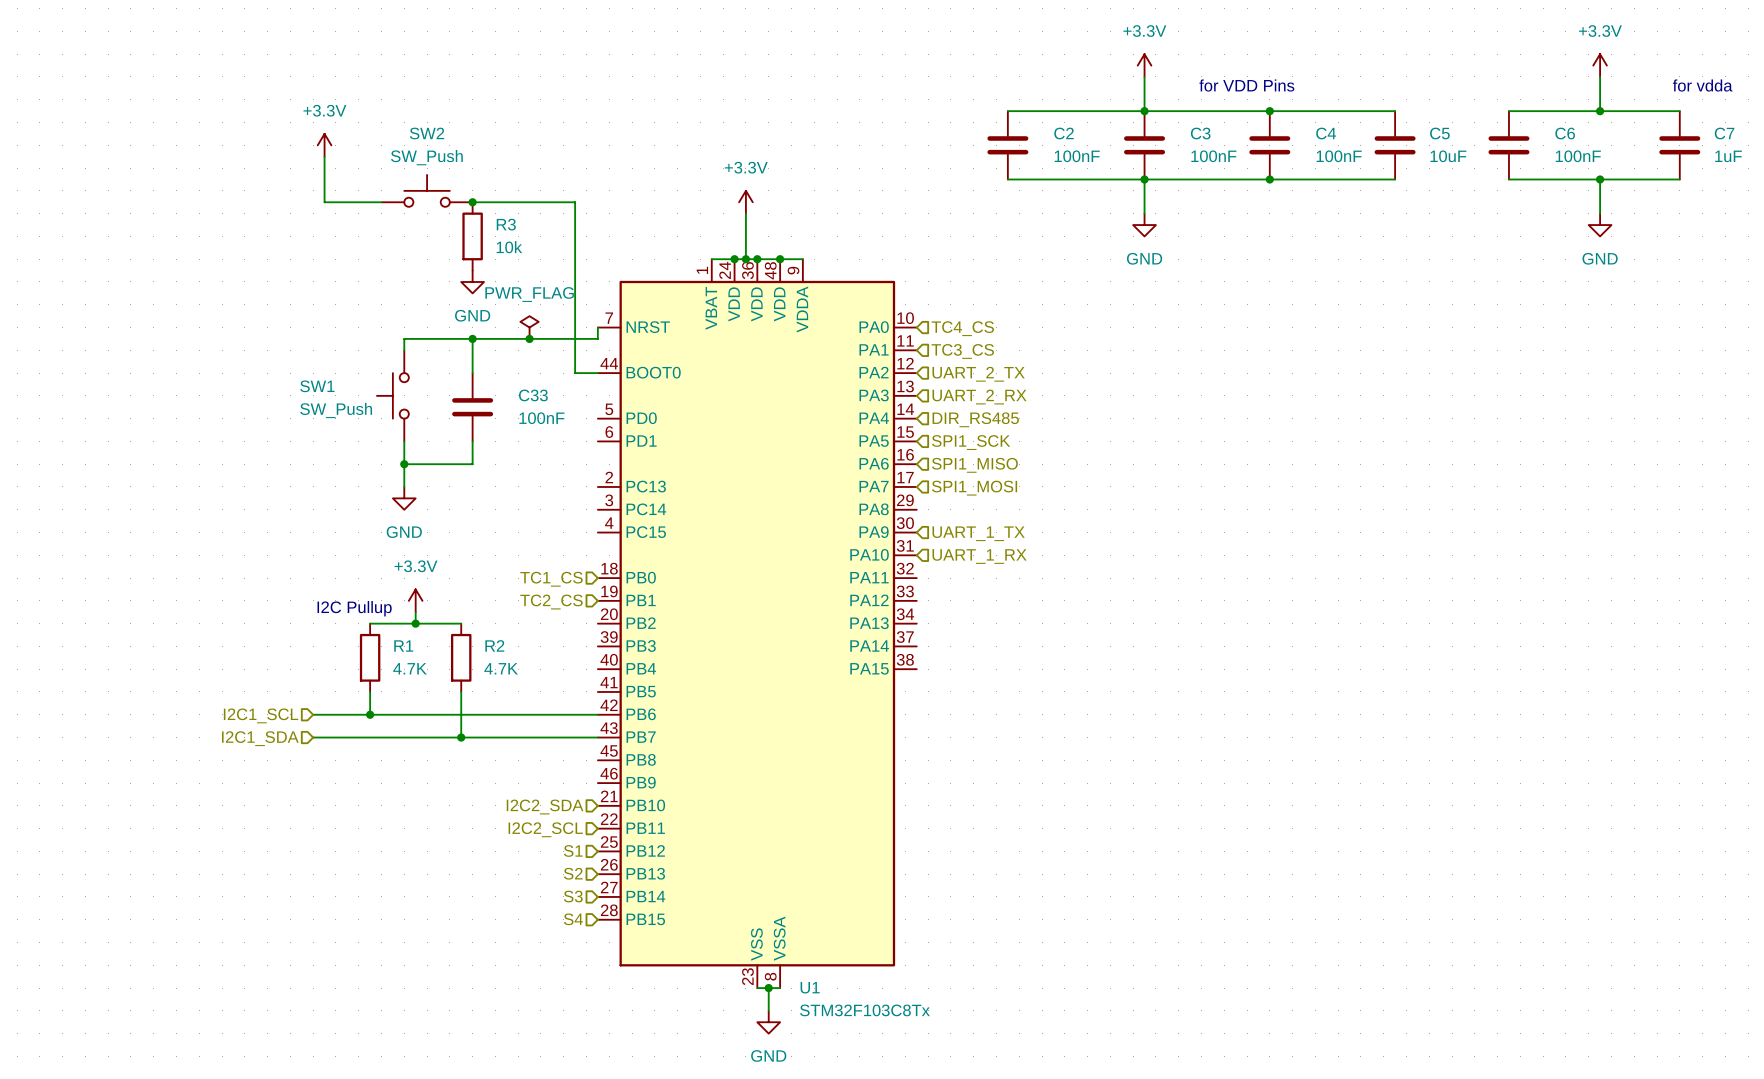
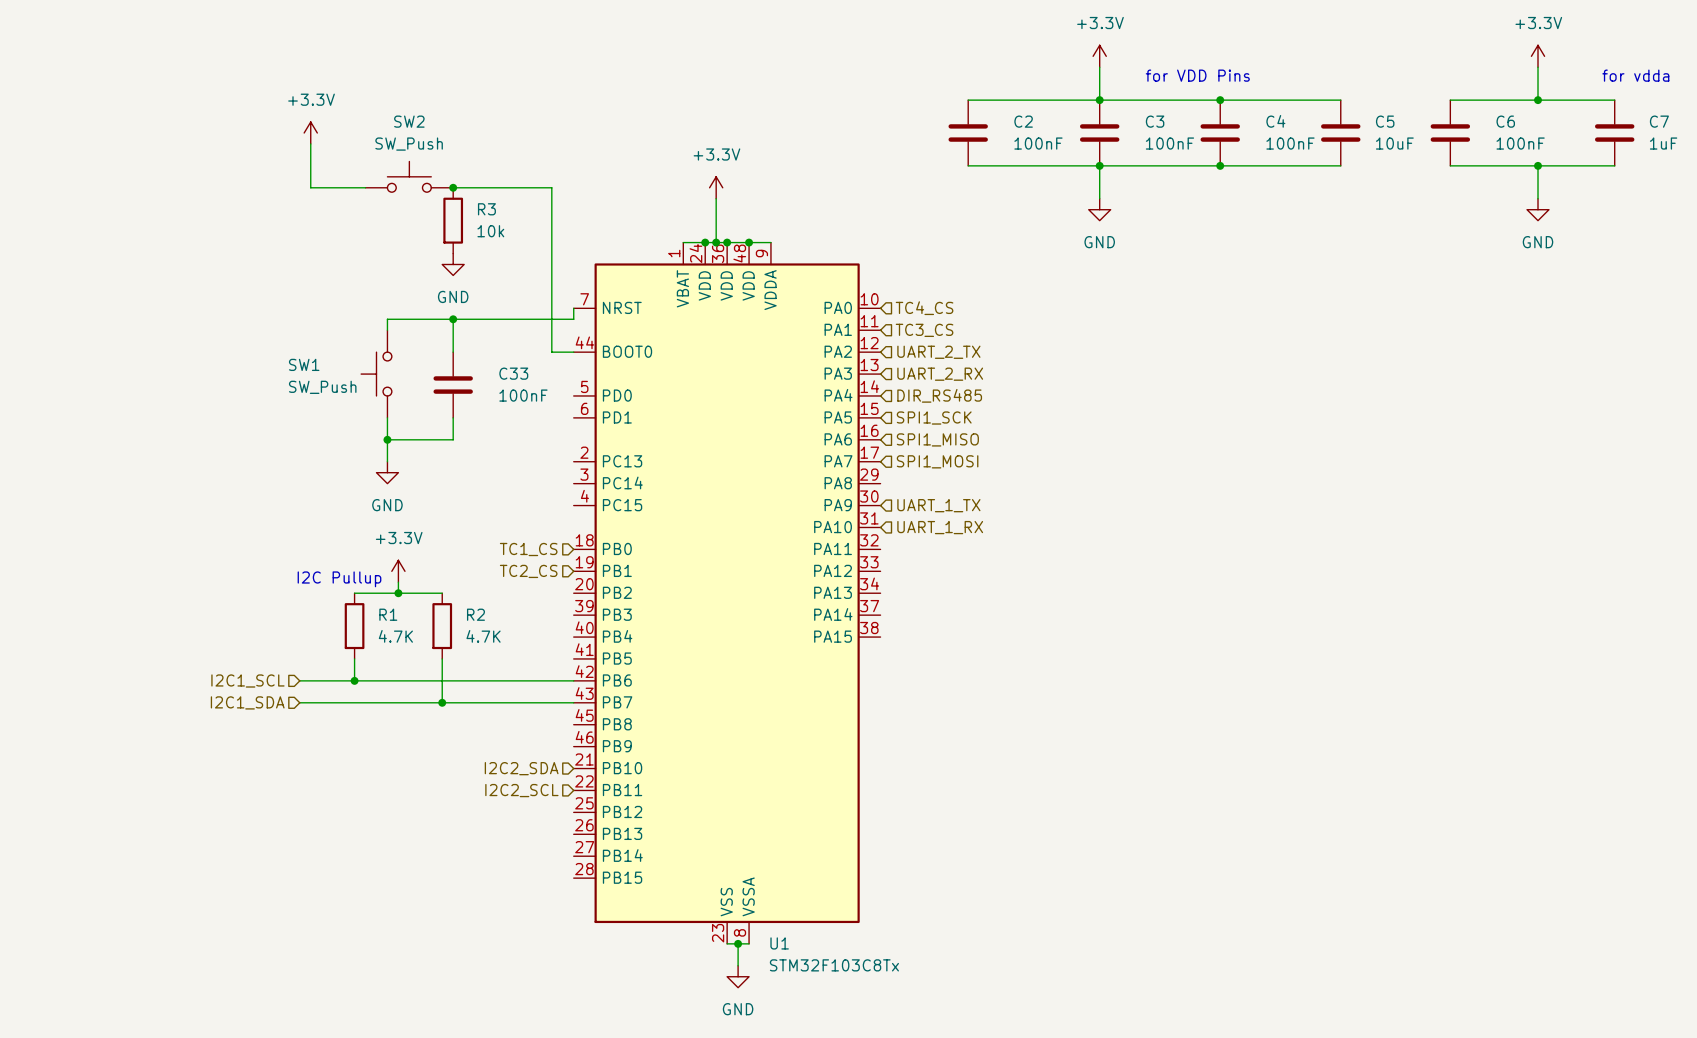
power symbol: PWR_FLAG (529, 327) -> none
junction: (529, 338) -> none
hierarchical label: S1 (573, 850) -> none
hierarchical label: S2 (573, 873) -> none
hierarchical label: S3 (573, 896) -> none
hierarchical label: S4 (573, 919) -> none

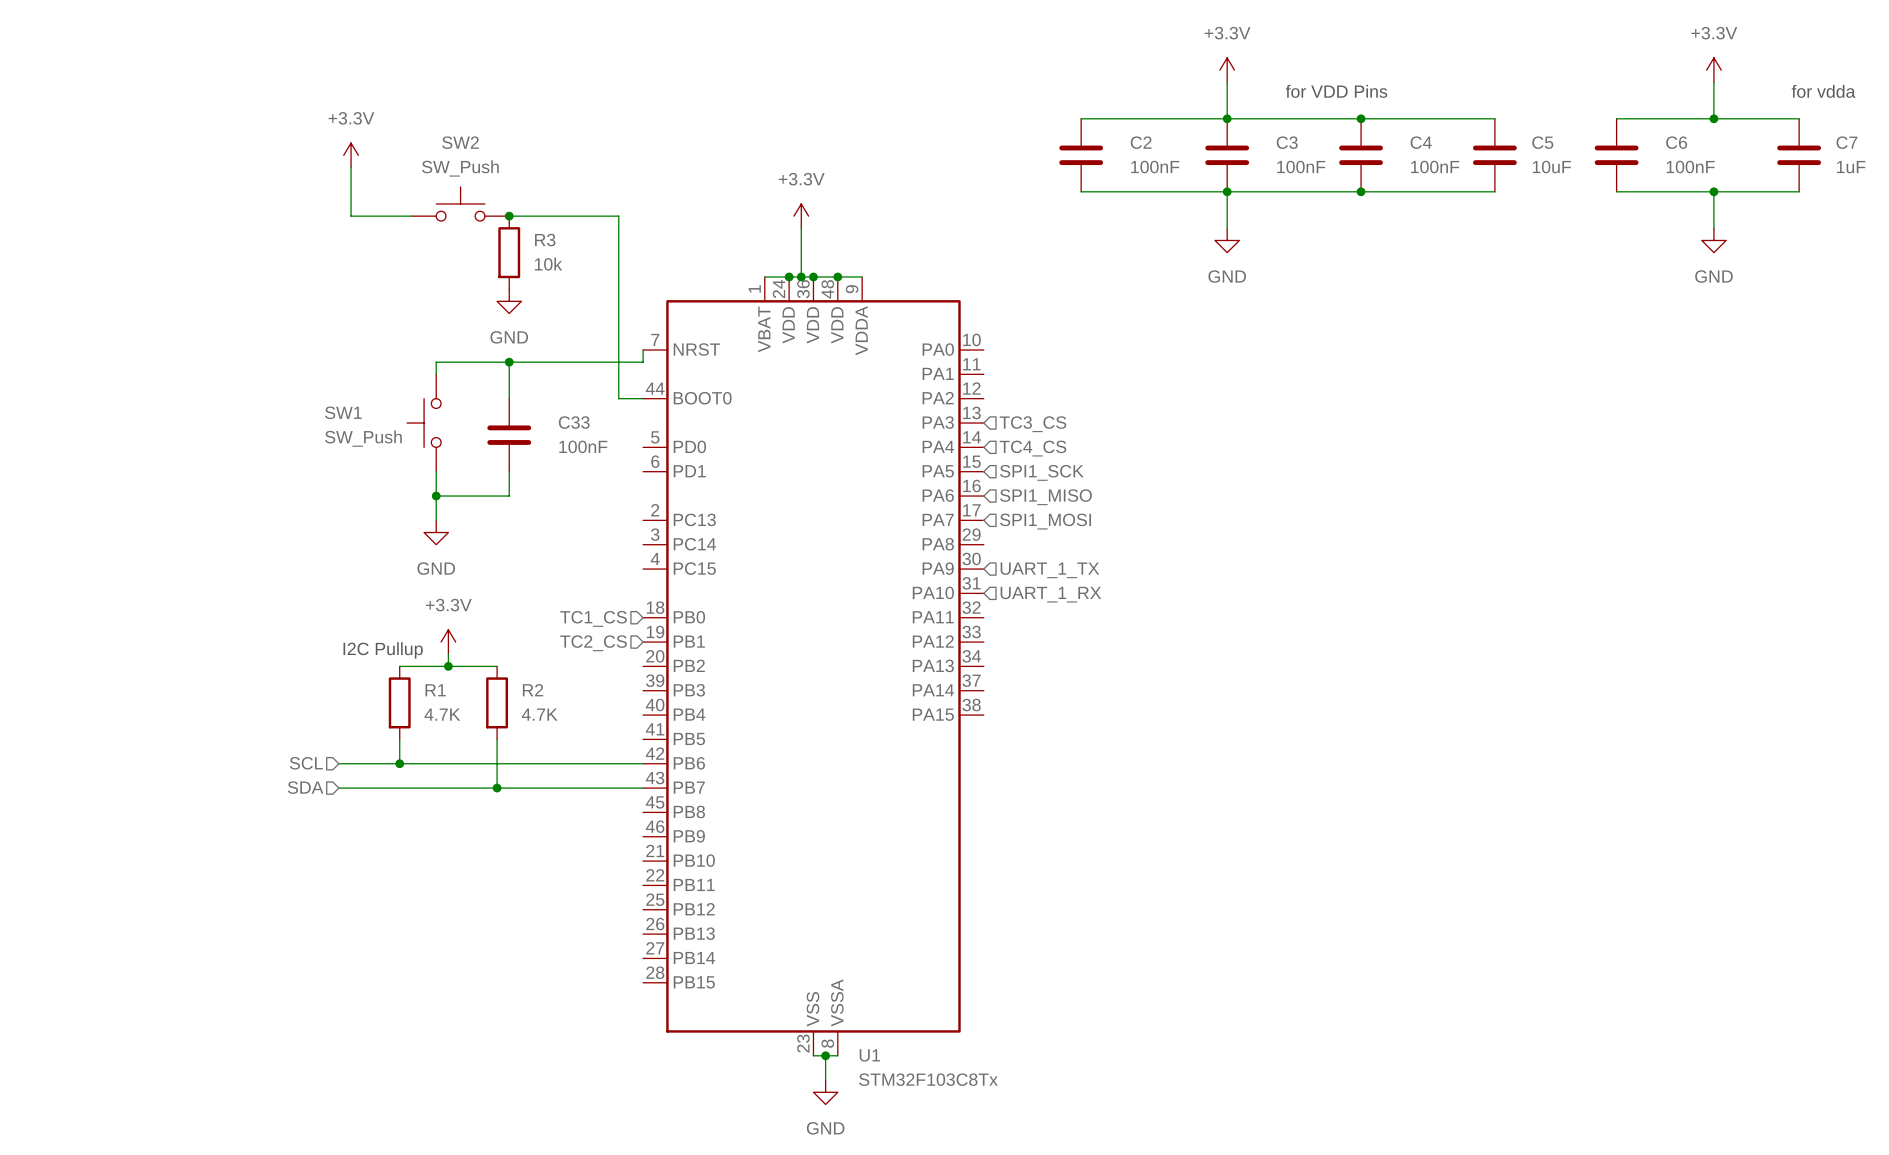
hierarchical label: TC4_CS (924, 308) -> none
hierarchical label: TC3_CS (924, 330) -> none
hierarchical label: UART_2_TX (938, 352) -> none
hierarchical label: UART_2_RX (940, 374) -> TC3_CS (1032, 424)
hierarchical label: DIR_RS485 (939, 395) -> TC4_CS (1032, 448)
hierarchical label: I2C1_SCL (247, 680) -> SCL (306, 763)
hierarchical label: I2C1_SDA (247, 702) -> SDA (305, 787)
hierarchical label: I2C2_SDA (521, 768) -> none
hierarchical label: I2C2_SCL (521, 790) -> none

